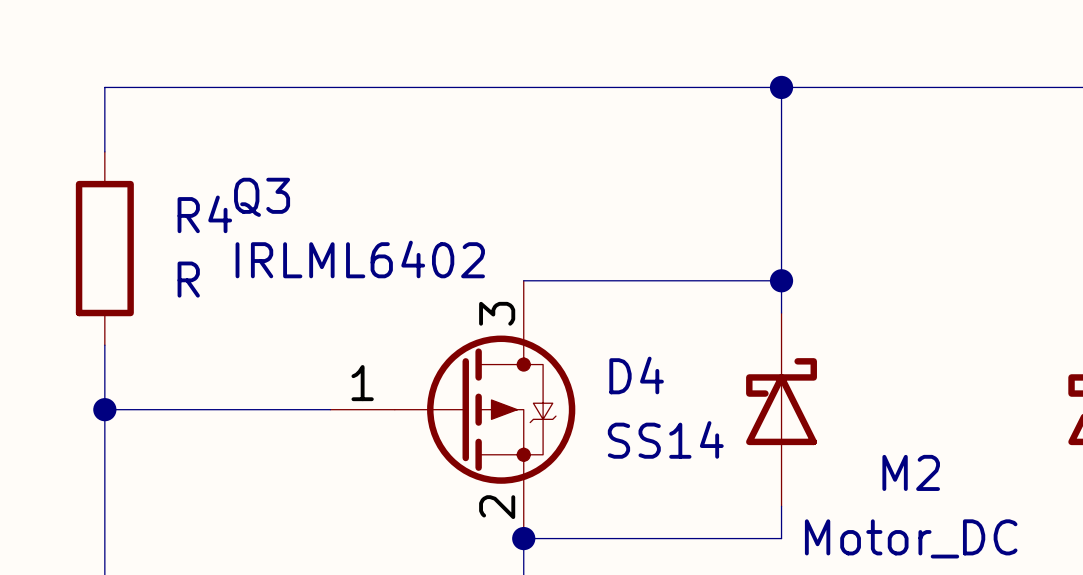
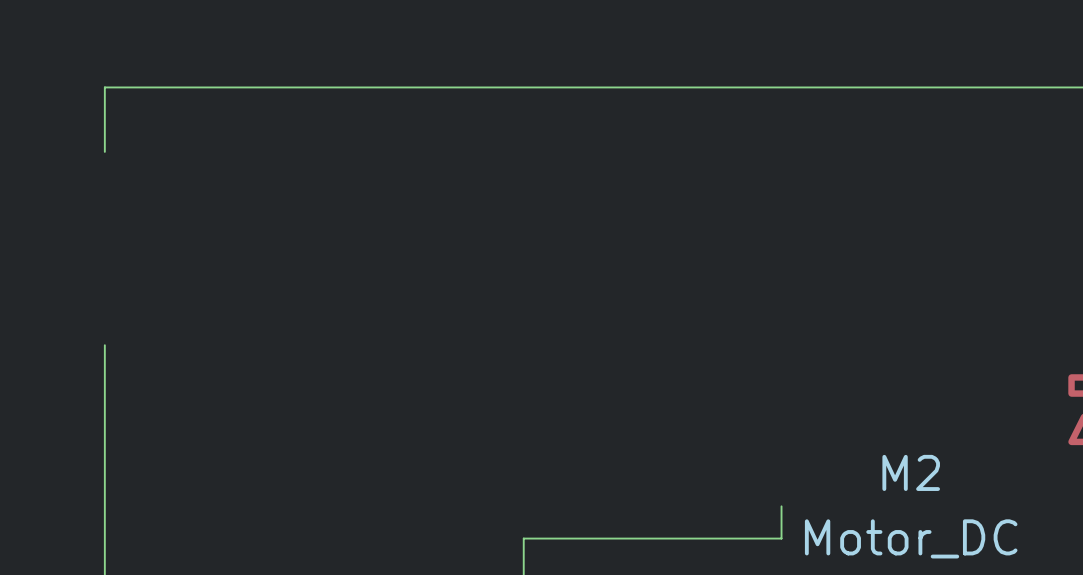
wire: (781, 87) (781, 313) -> none
junction: (781, 87) -> none
R4: R (104, 248) -> none
wire: (523, 280) (781, 280) -> none
junction: (781, 280) -> none
wire: (104, 409) (330, 409) -> none
junction: (104, 409) -> none
Q3: IRLML6402 (452, 409) -> none
D4: SS14 (781, 409) -> none
junction: (523, 538) -> none

